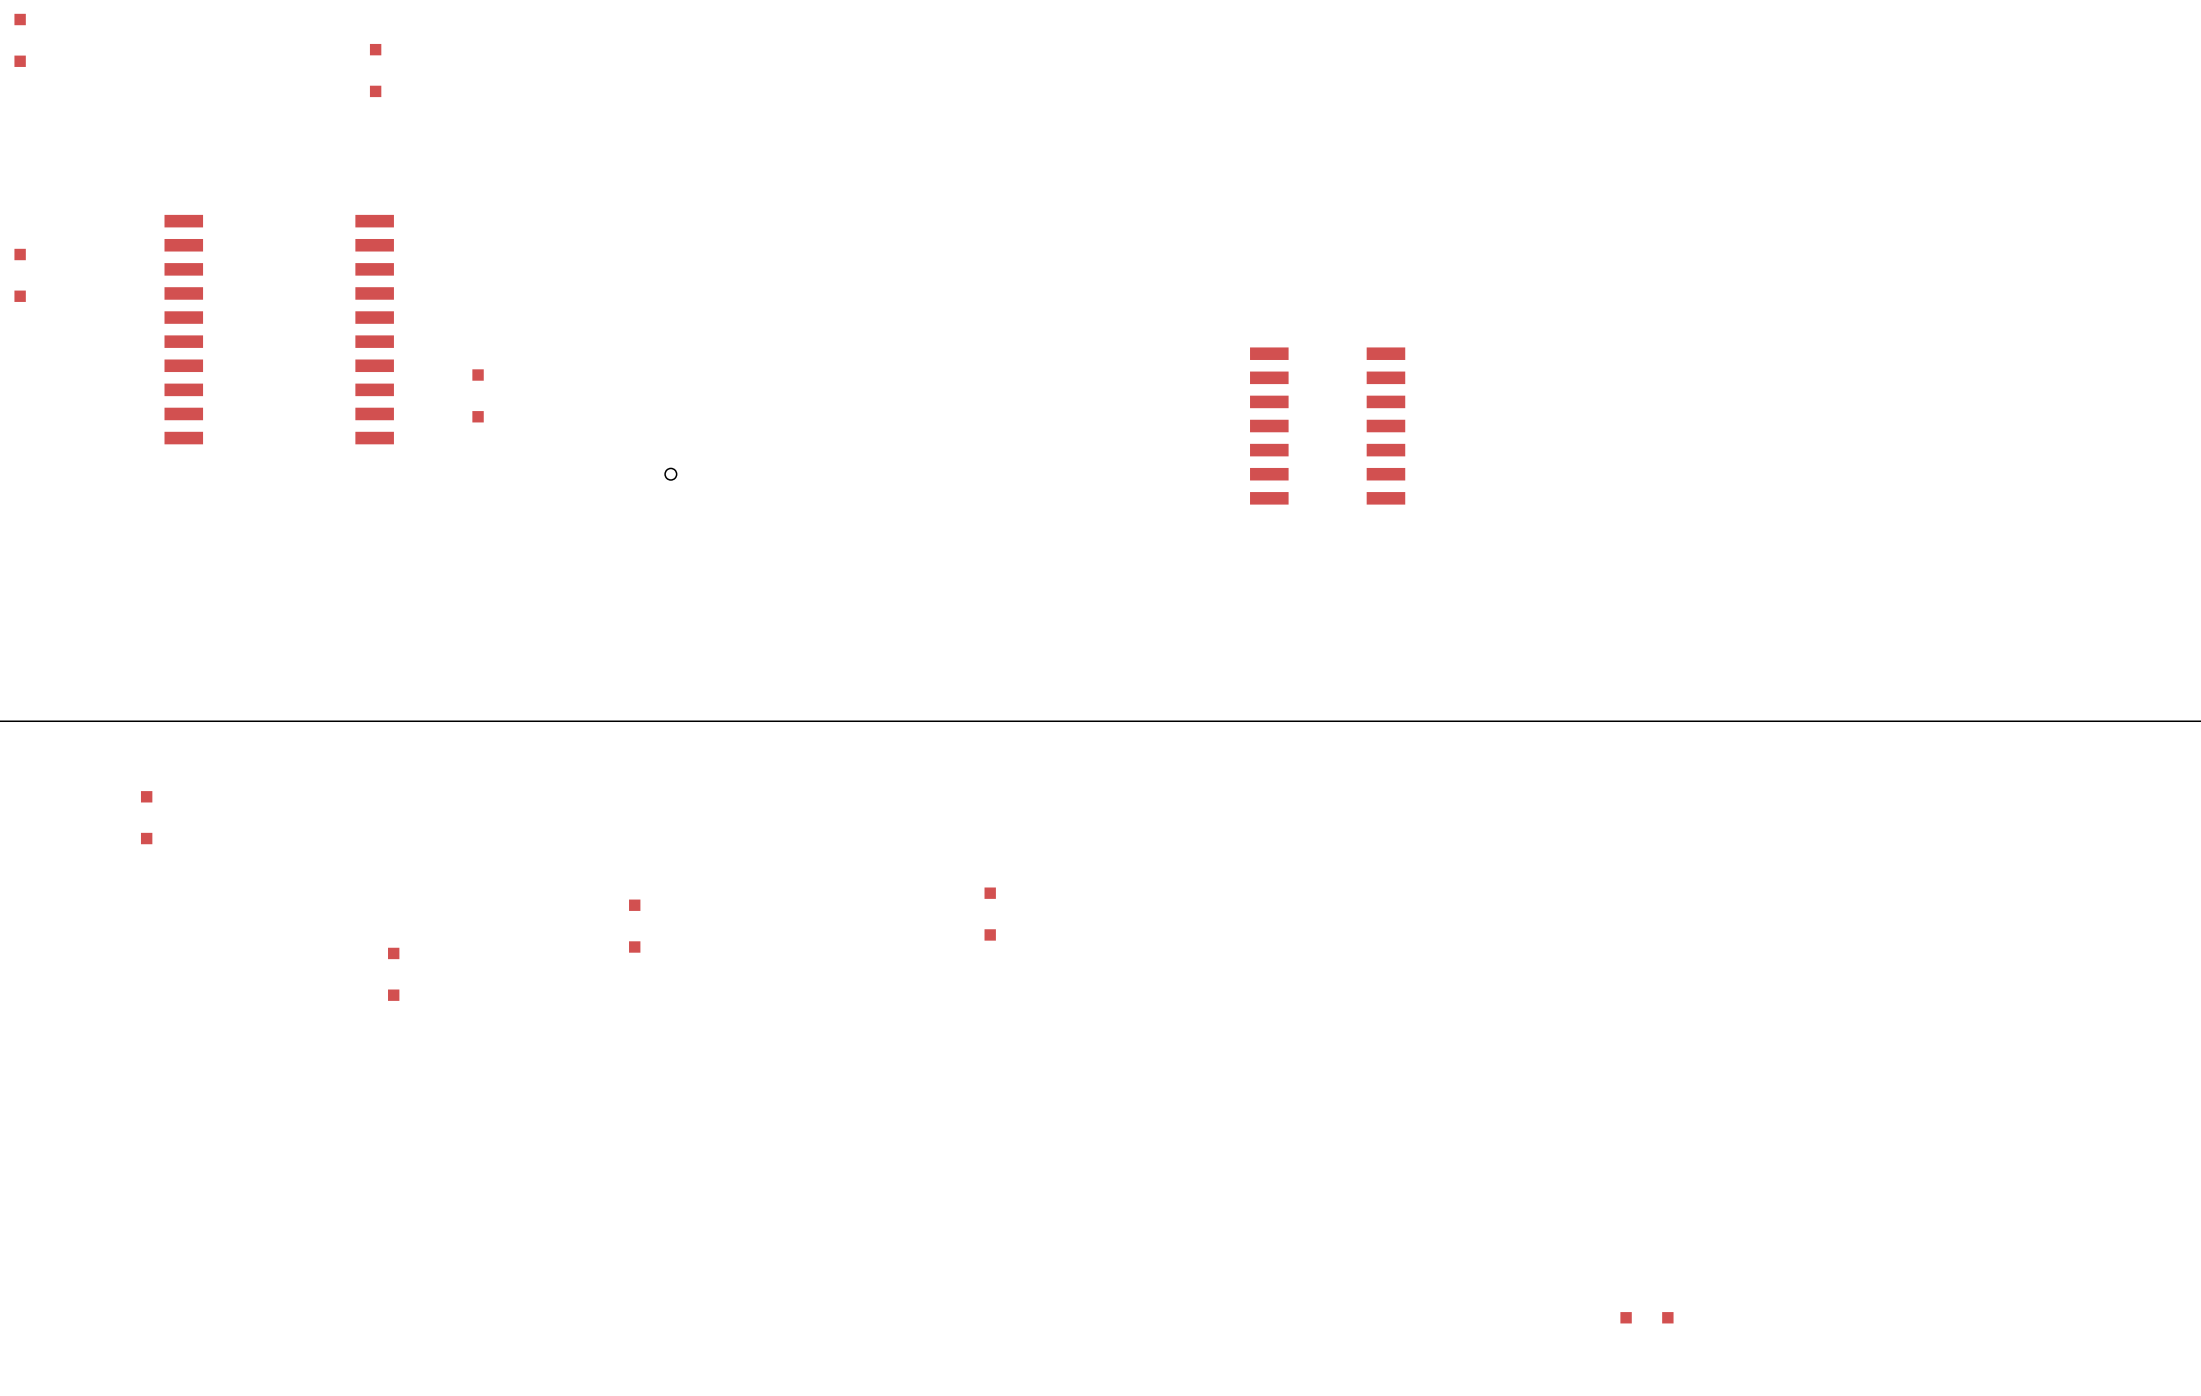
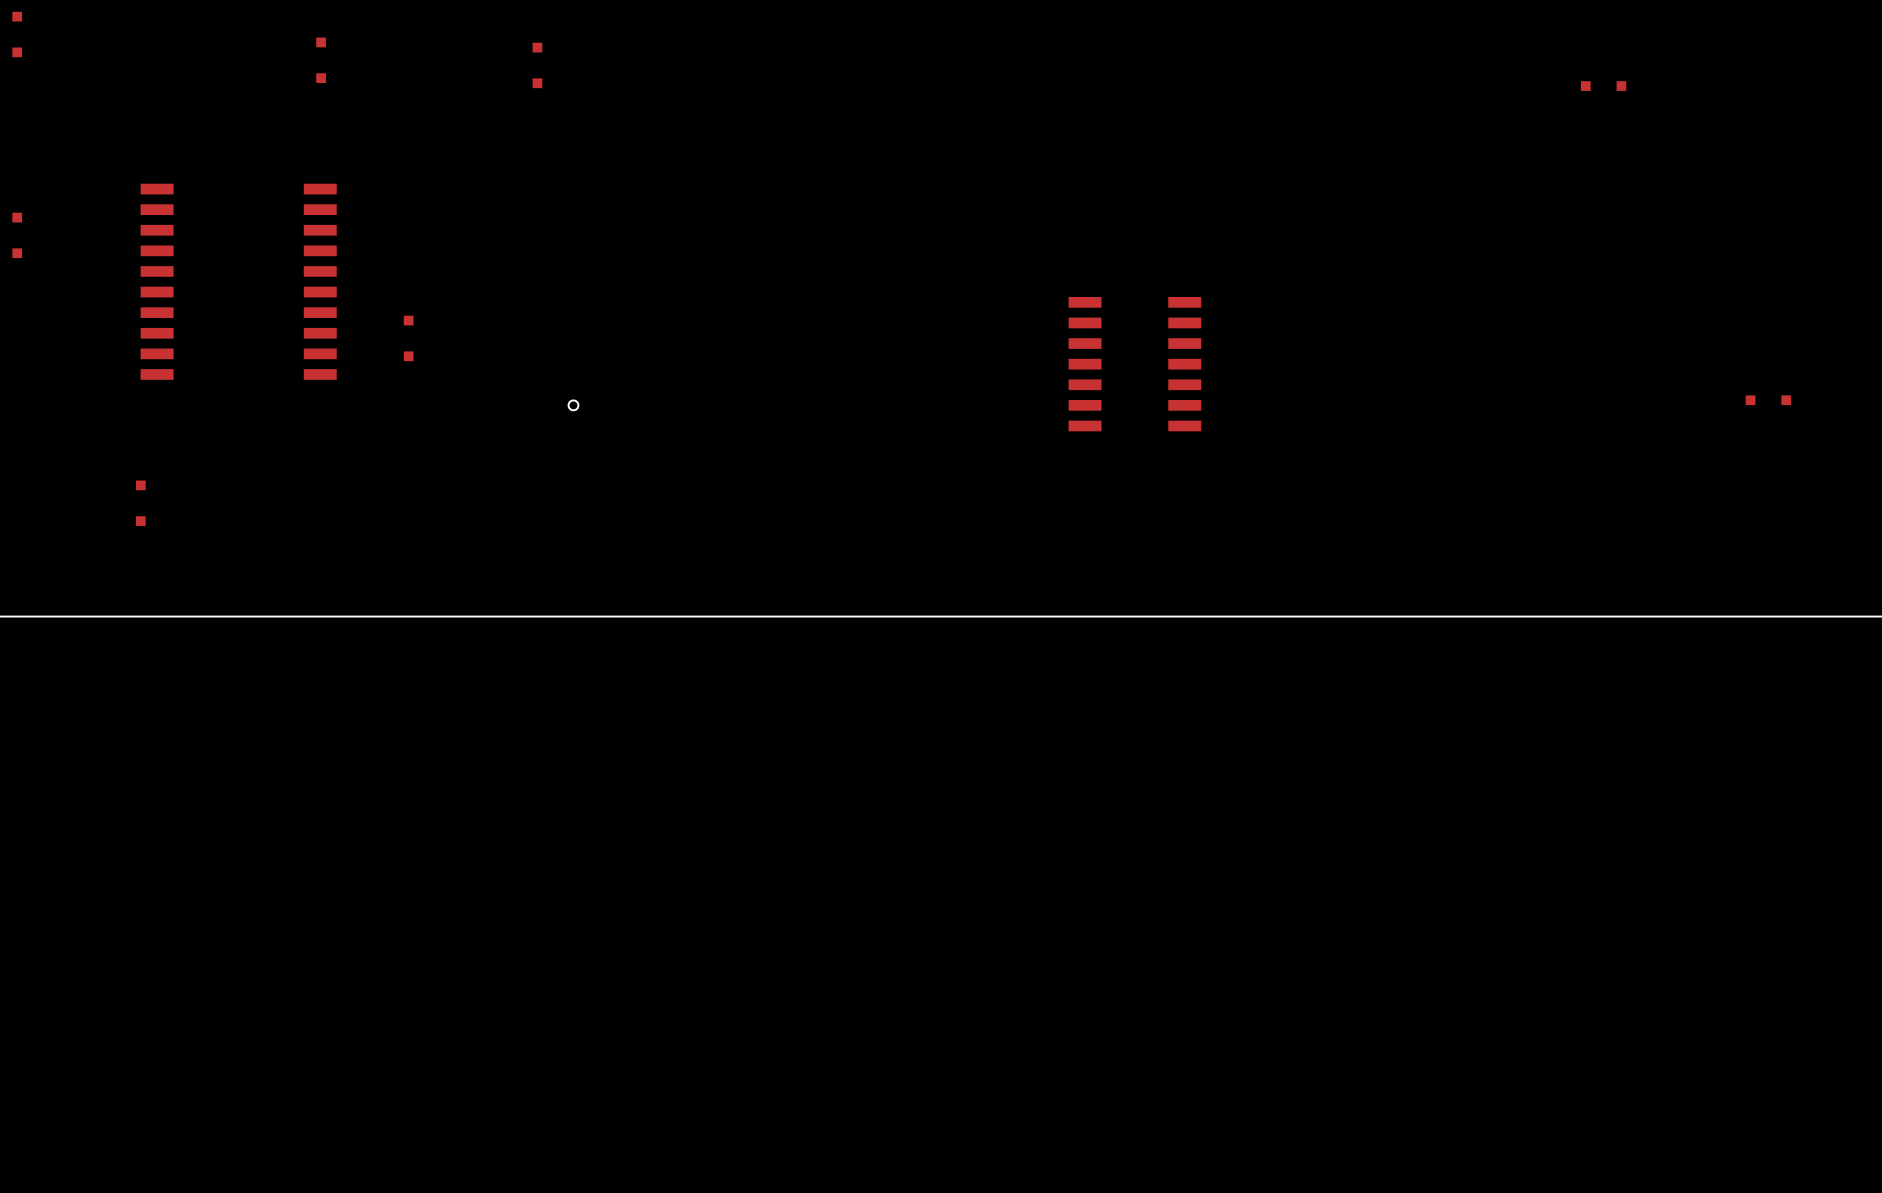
part: none -> (537, 65)
part: none -> (1603, 86)
part: none -> (1768, 400)
part: none -> (140, 503)
part: (146, 817) -> none
part: (990, 914) -> none
part: (634, 926) -> none
part: (393, 974) -> none
part: (1646, 1317) -> none

